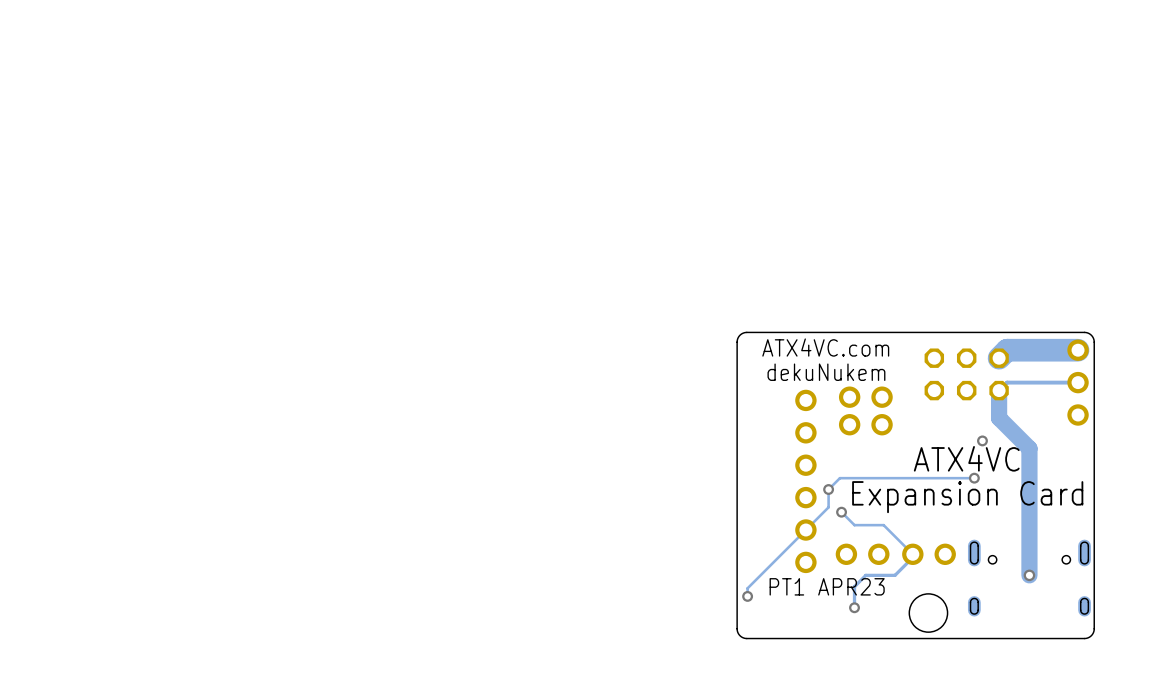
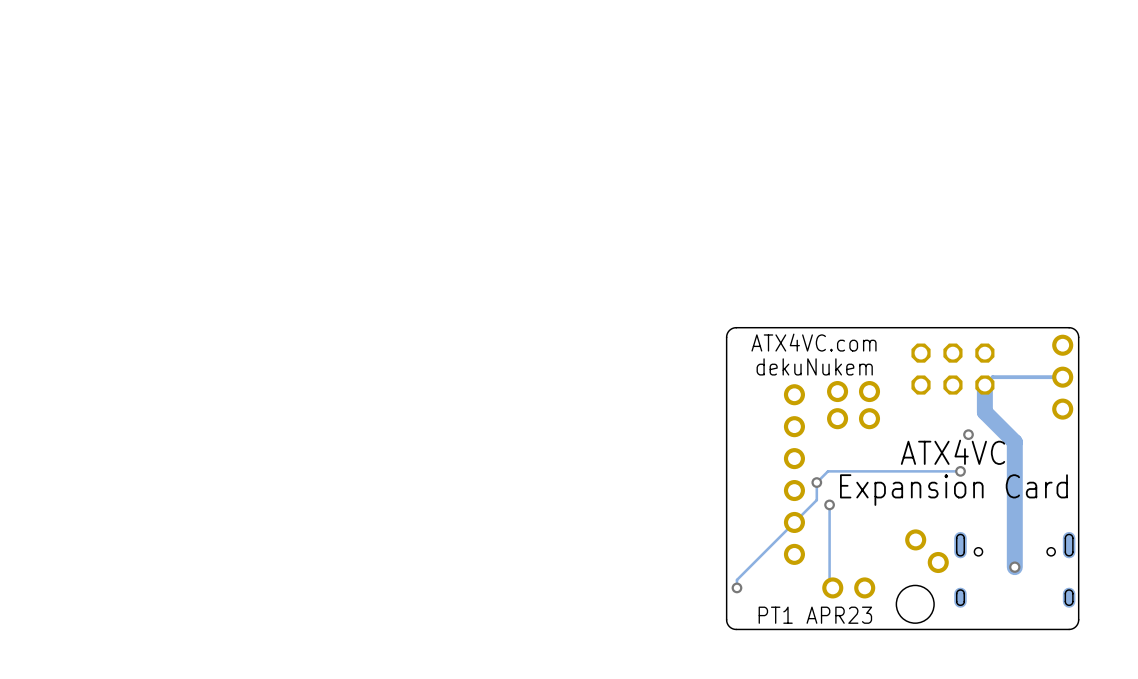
track: (1078, 350) (1007, 350) (999, 358) -> none
track: (841, 512) (854, 525) (883, 525) (912, 554) (912, 557) (895, 575) (865, 575) (854, 586) (854, 607) -> (829, 504) (829, 584) (832, 587)
part position: (862, 554) -> (848, 587)
part rotation: 0° (929, 554) -> 45° clockwise (926, 551)
text position: PT1 APR23 (827, 586) -> PT1 APR23 (815, 615)
via: (854, 607) -> none

